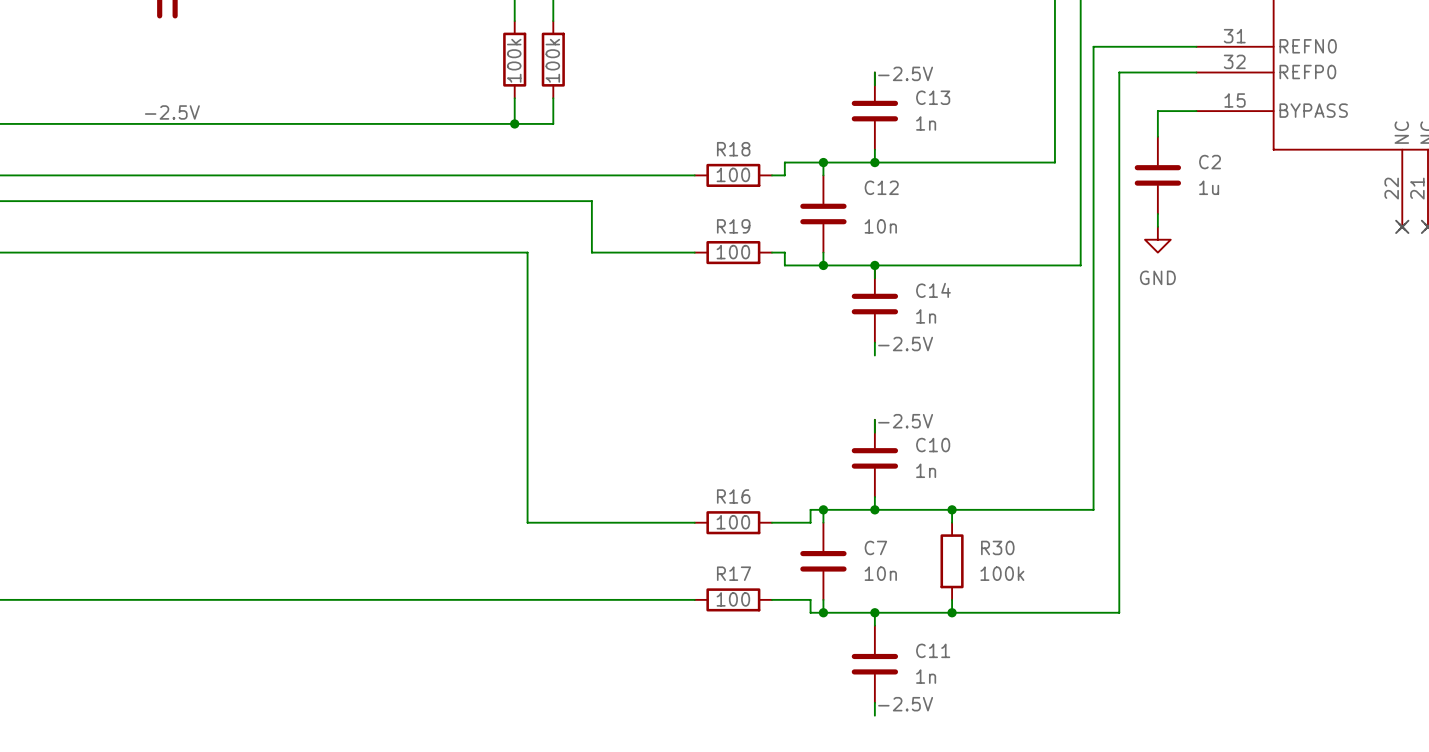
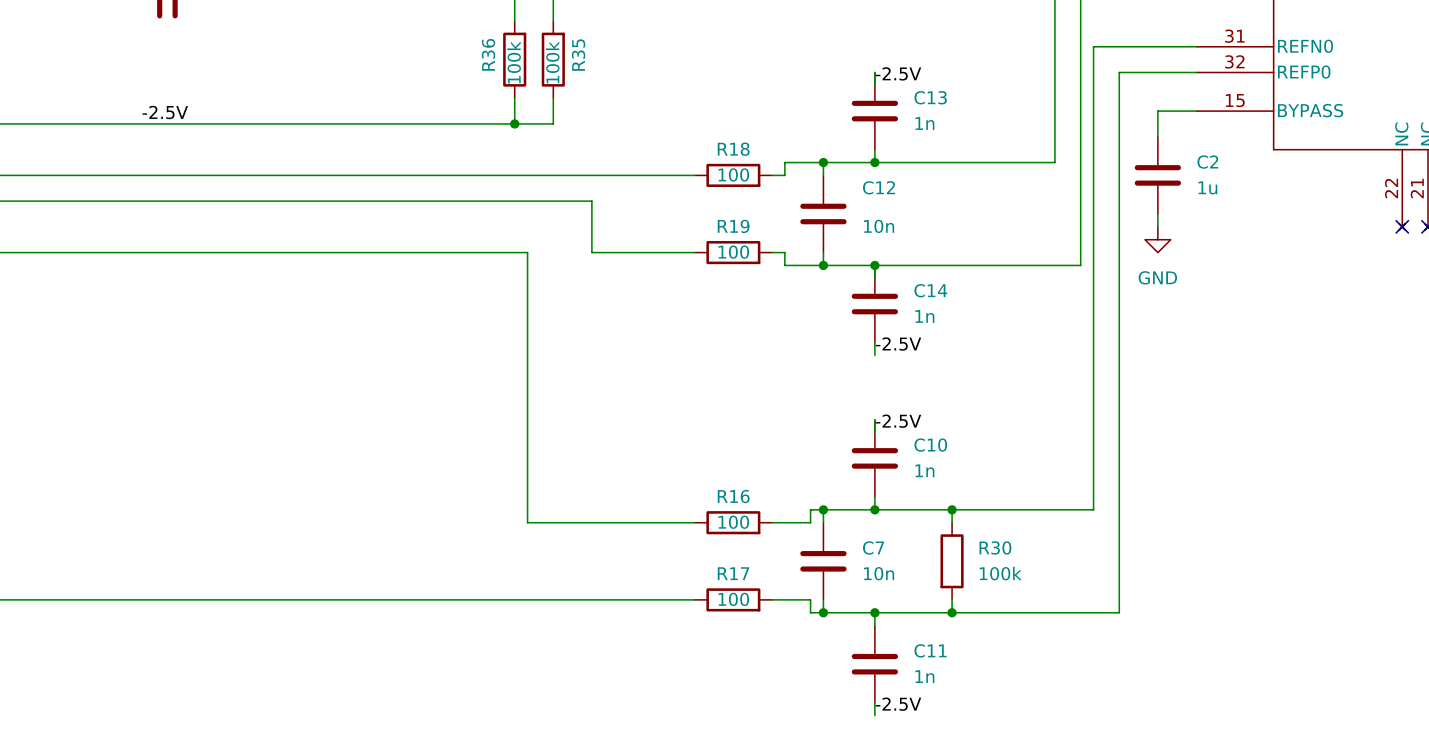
R36 name: none -> R36 (488, 54)
R35 name: none -> R35 (578, 55)

